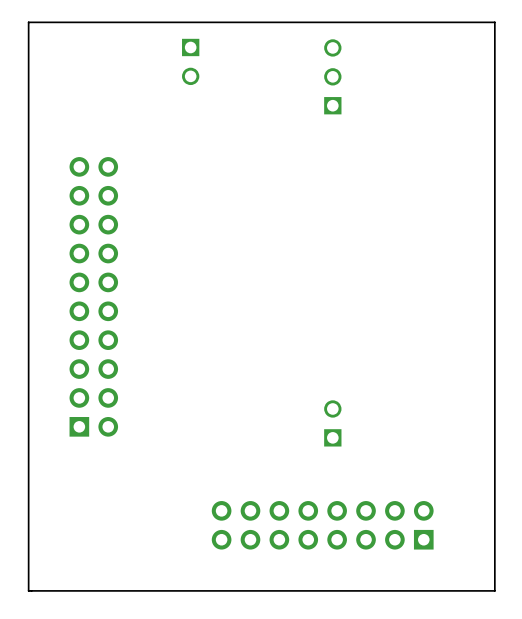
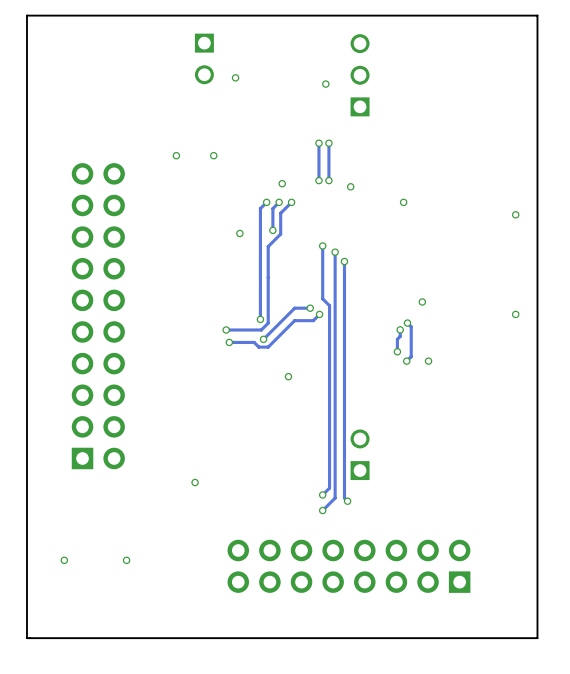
via: none -> (235, 77)
via: none -> (325, 84)
track: none -> (318, 143) (318, 180)
via: none -> (318, 143)
track: none -> (328, 143) (328, 180)
via: none -> (328, 143)
via: none -> (176, 155)
via: none -> (213, 155)
via: none -> (318, 180)
via: none -> (328, 180)
via: none -> (282, 183)
via: none -> (350, 186)
track: none -> (266, 202) (260, 208) (260, 319)
via: none -> (266, 202)
track: none -> (279, 202) (272, 208) (272, 230)
via: none -> (279, 202)
track: none -> (291, 202) (280, 213) (280, 234) (268, 246) (268, 323) (261, 329) (226, 329)
via: none -> (291, 202)
via: none -> (403, 202)
via: none -> (515, 214)
via: none -> (272, 230)
via: none -> (239, 233)
track: none -> (322, 245) (322, 298) (329, 305) (329, 488) (322, 494)
via: none -> (322, 245)
track: none -> (335, 252) (335, 498) (322, 510)
via: none -> (335, 252)
track: none -> (344, 261) (344, 498) (347, 501)
via: none -> (344, 261)
via: none -> (422, 301)
track: none -> (310, 308) (294, 308) (263, 339)
via: none -> (310, 308)
track: none -> (319, 314) (313, 320) (294, 320) (268, 347) (258, 347) (254, 342) (229, 342)
via: none -> (319, 314)
via: none -> (515, 314)
via: none -> (260, 319)
track: none -> (407, 323) (411, 326) (411, 356) (406, 361)
via: none -> (407, 323)
via: none -> (226, 329)
track: none -> (400, 329) (400, 336) (397, 339) (398, 351)
via: none -> (400, 329)
via: none -> (263, 339)
via: none -> (229, 342)
via: none -> (397, 351)
via: none -> (406, 361)
via: none -> (428, 361)
via: none -> (288, 376)
via: none -> (195, 482)
via: none -> (322, 494)
via: none -> (347, 501)
via: none -> (322, 510)
via: none -> (64, 560)
via: none -> (126, 560)

